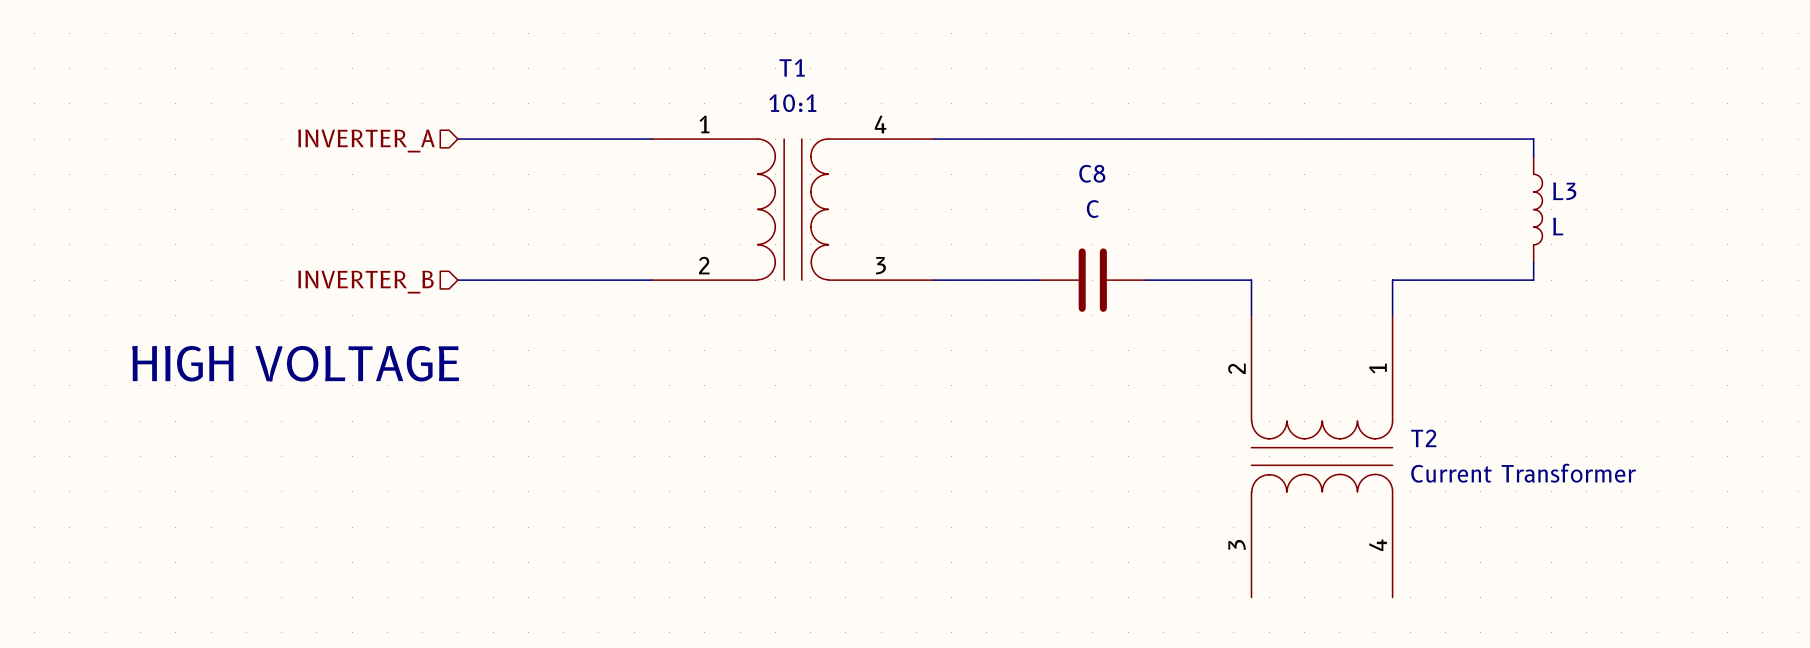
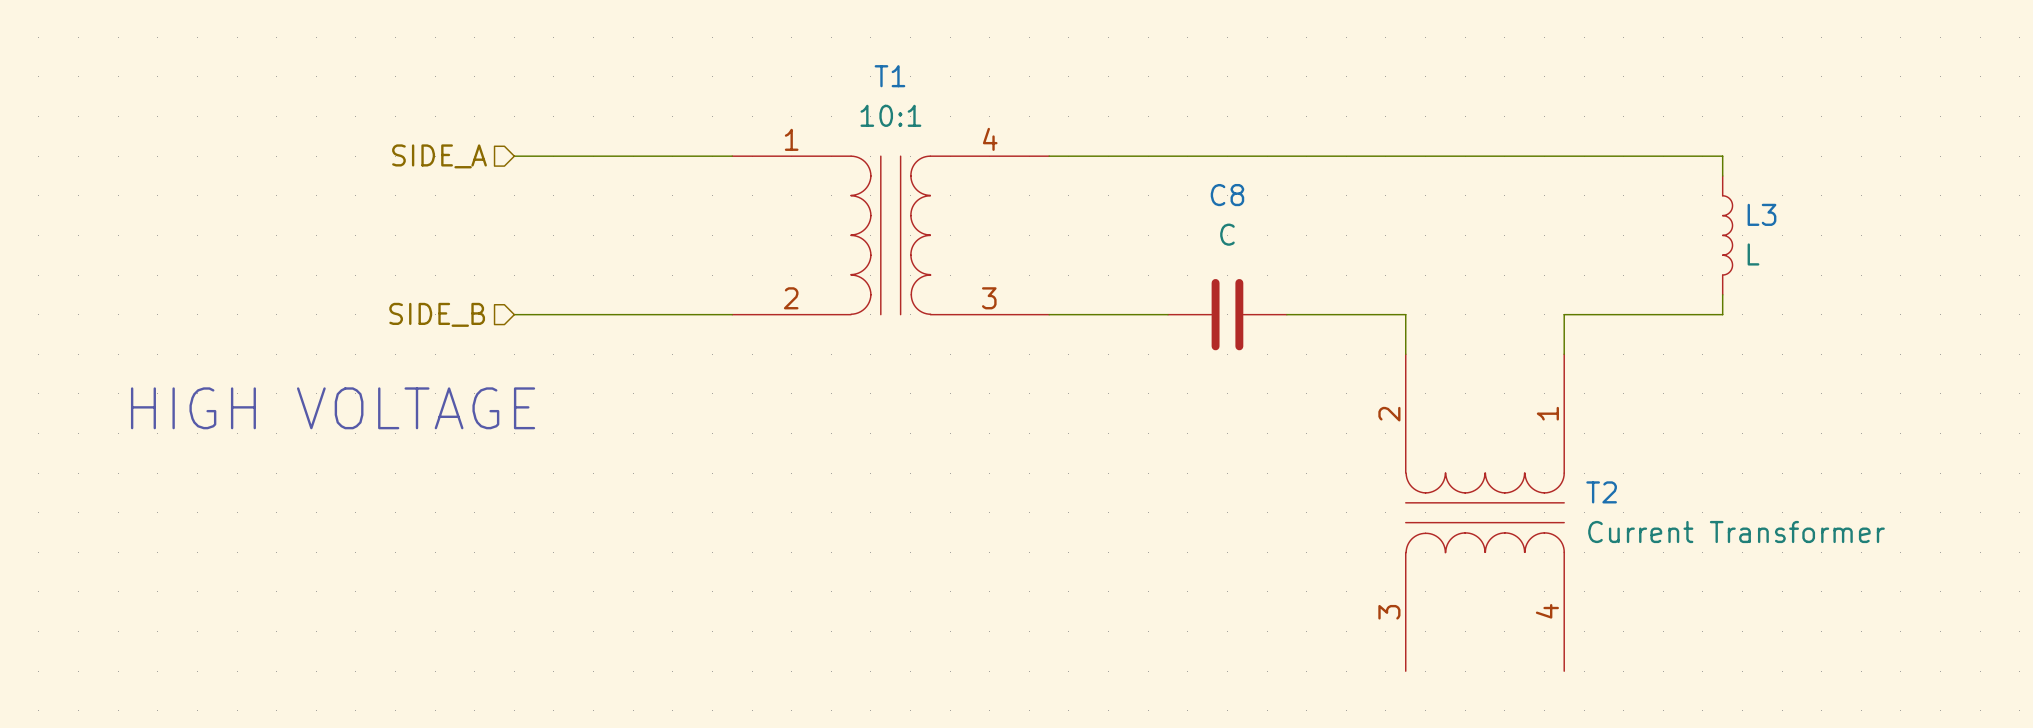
hierarchical label: INVERTER_A (366, 141) -> SIDE_A (439, 156)
hierarchical label: INVERTER_B (365, 282) -> SIDE_B (437, 314)

